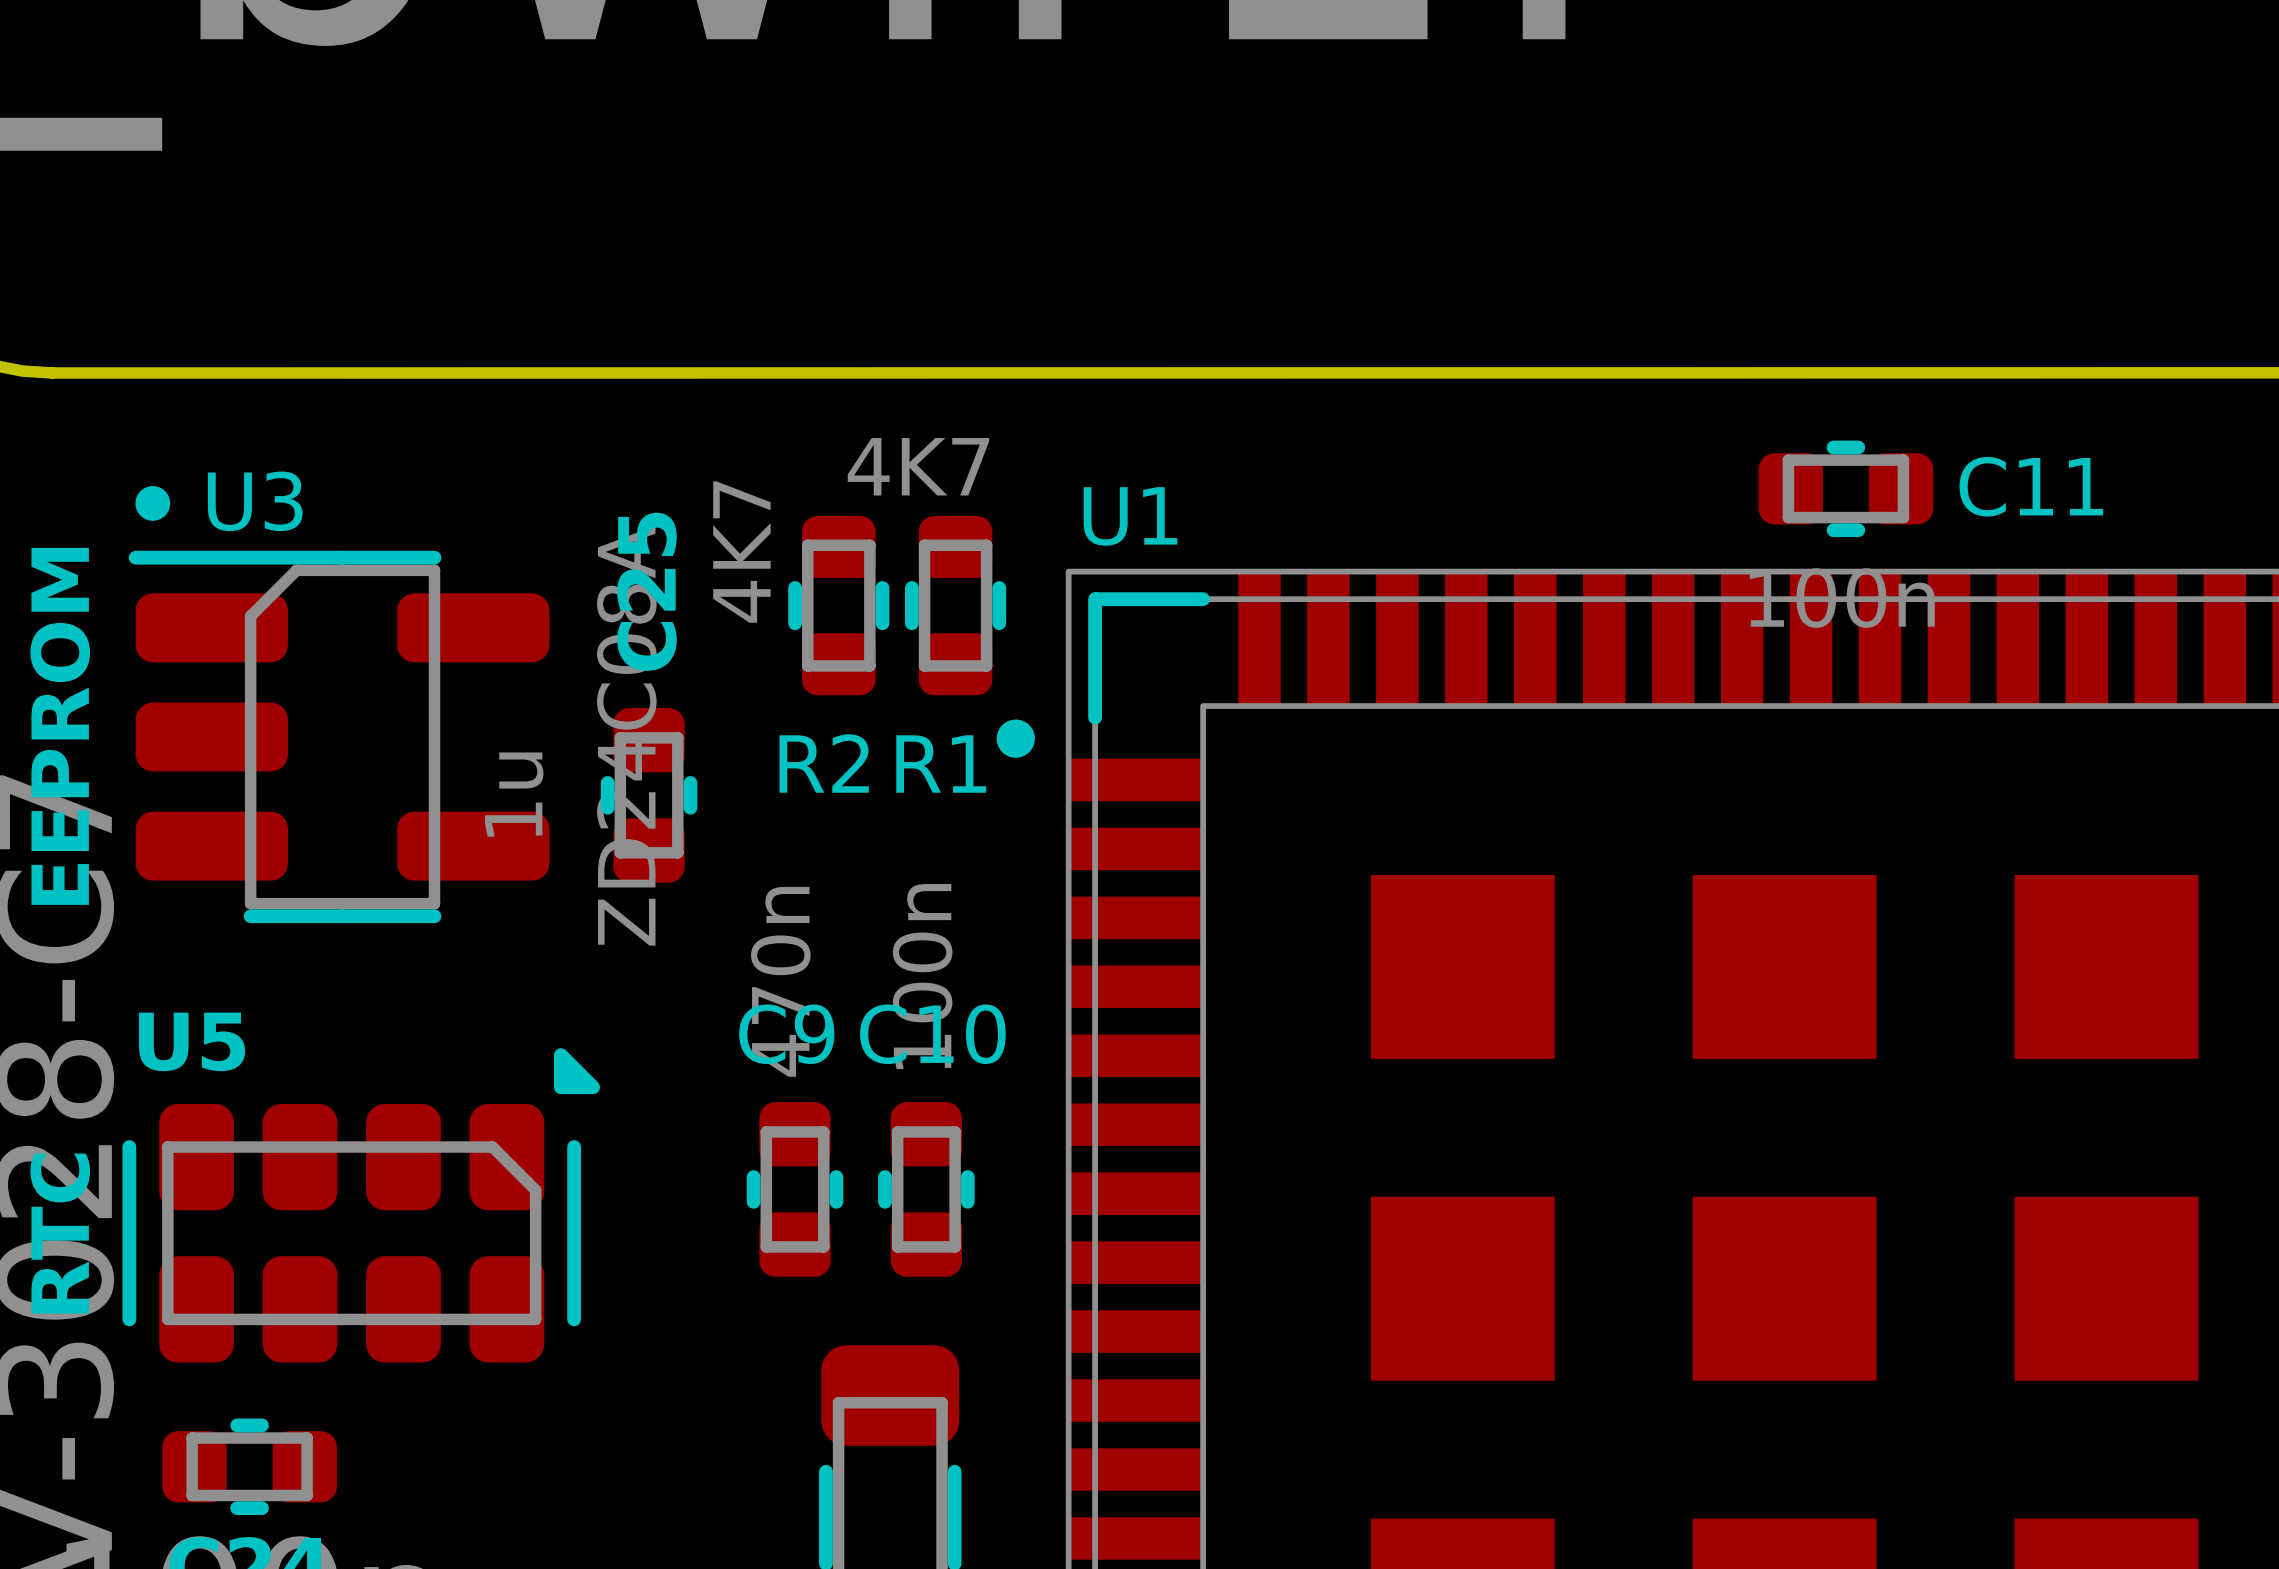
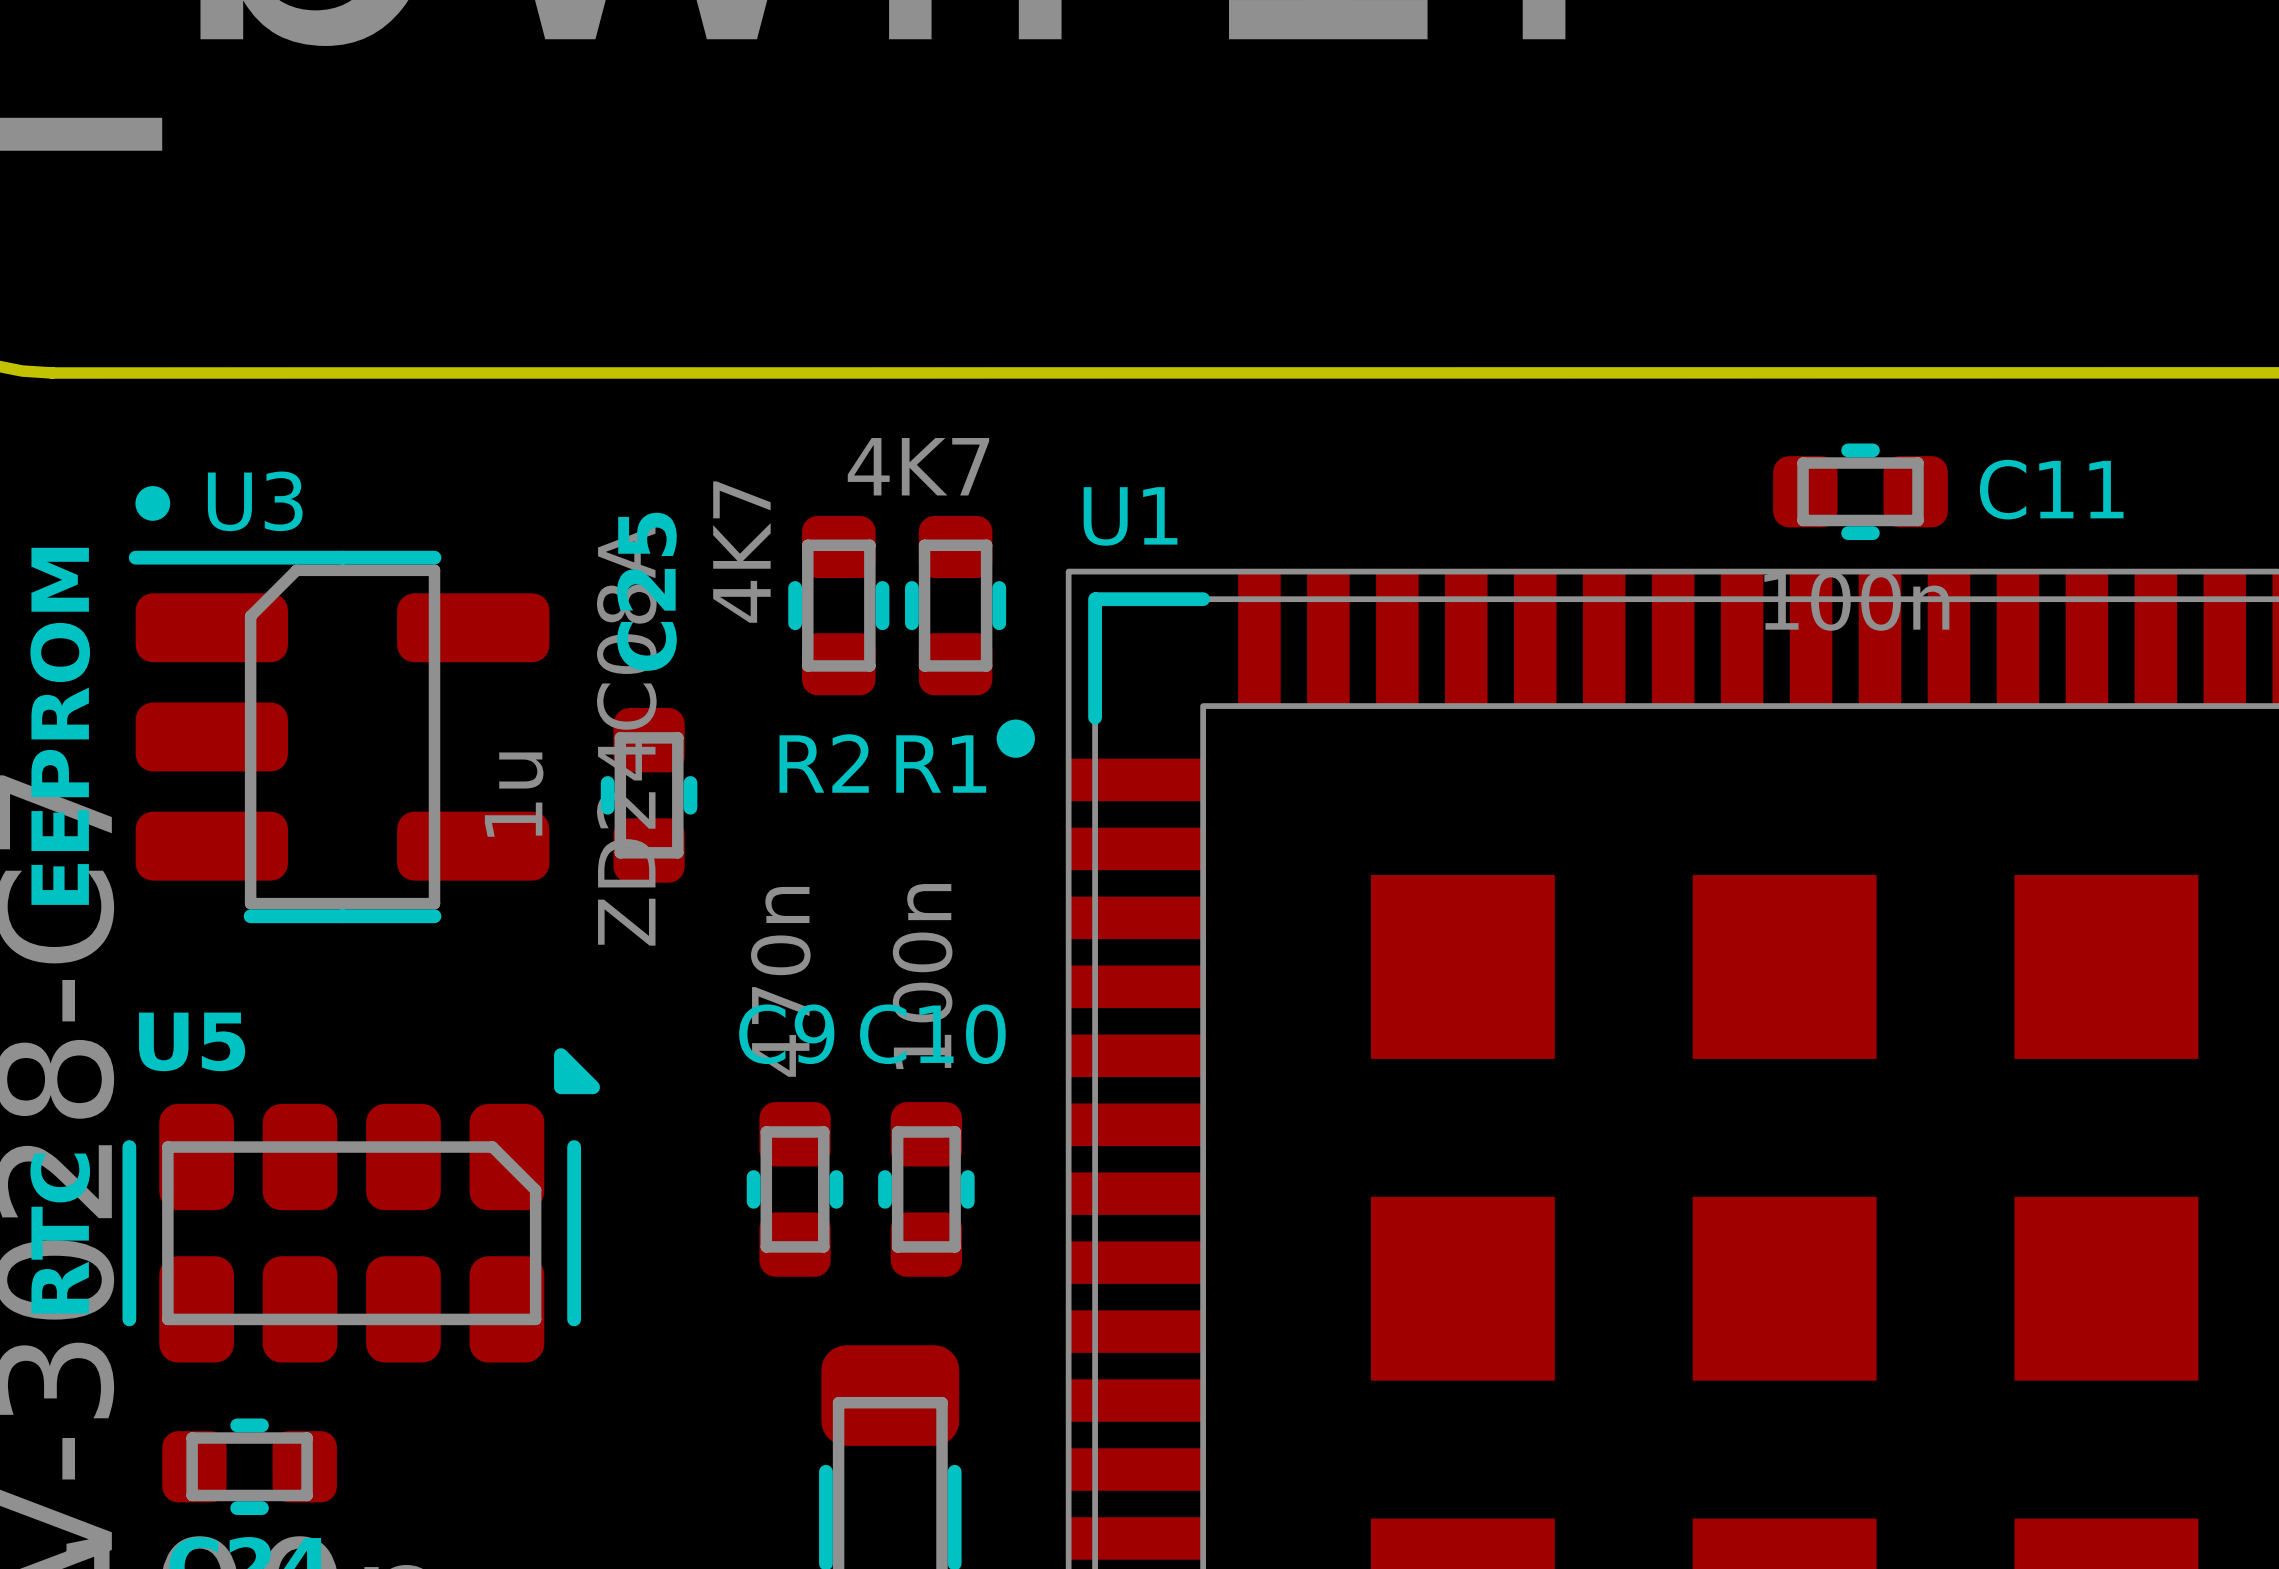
C11 name position: C11 (2031, 486) -> C11 (2051, 489)
C11 position: (1845, 488) -> (1860, 491)

